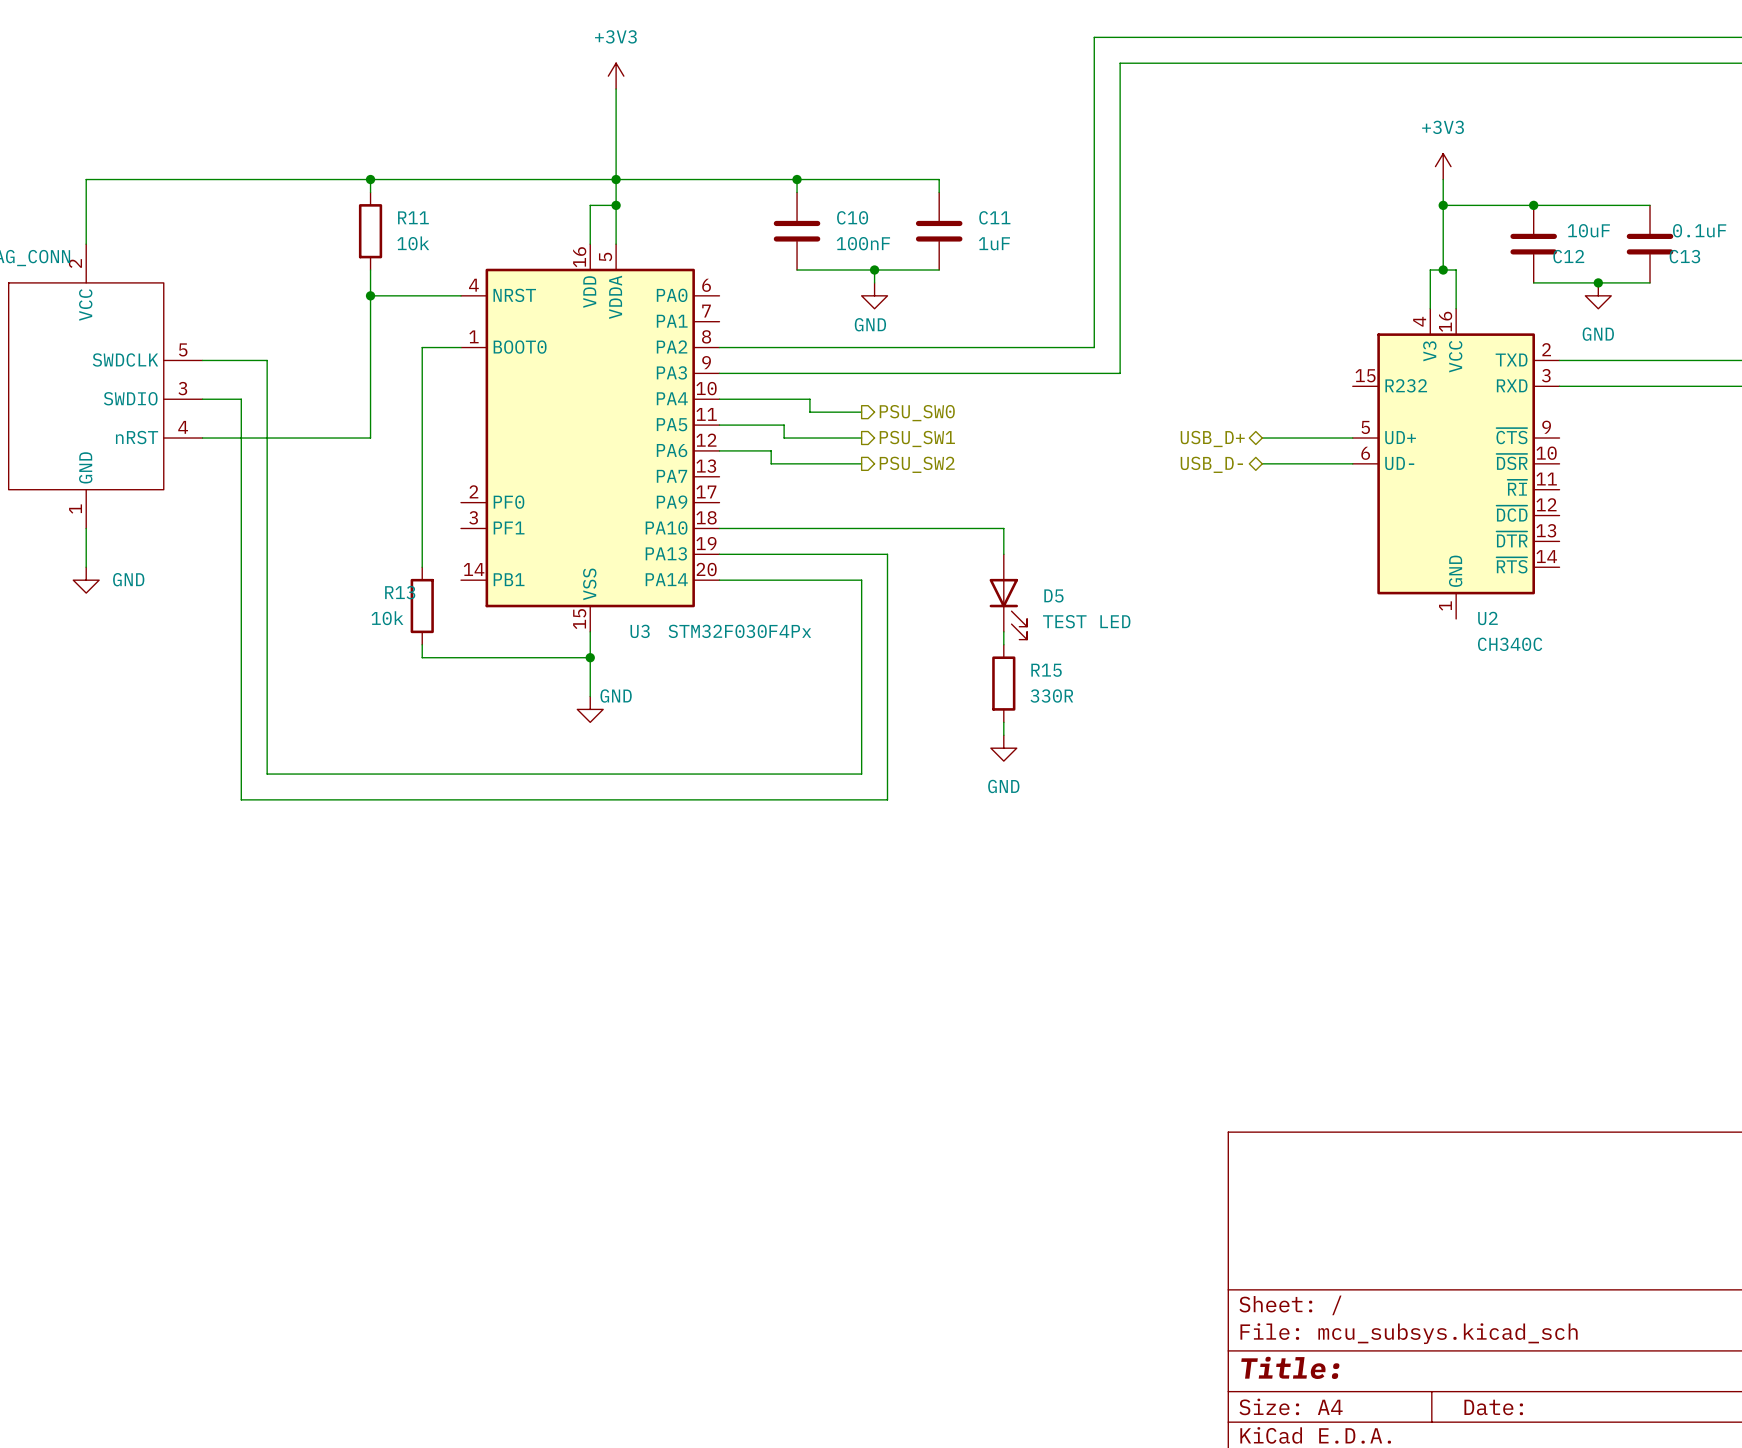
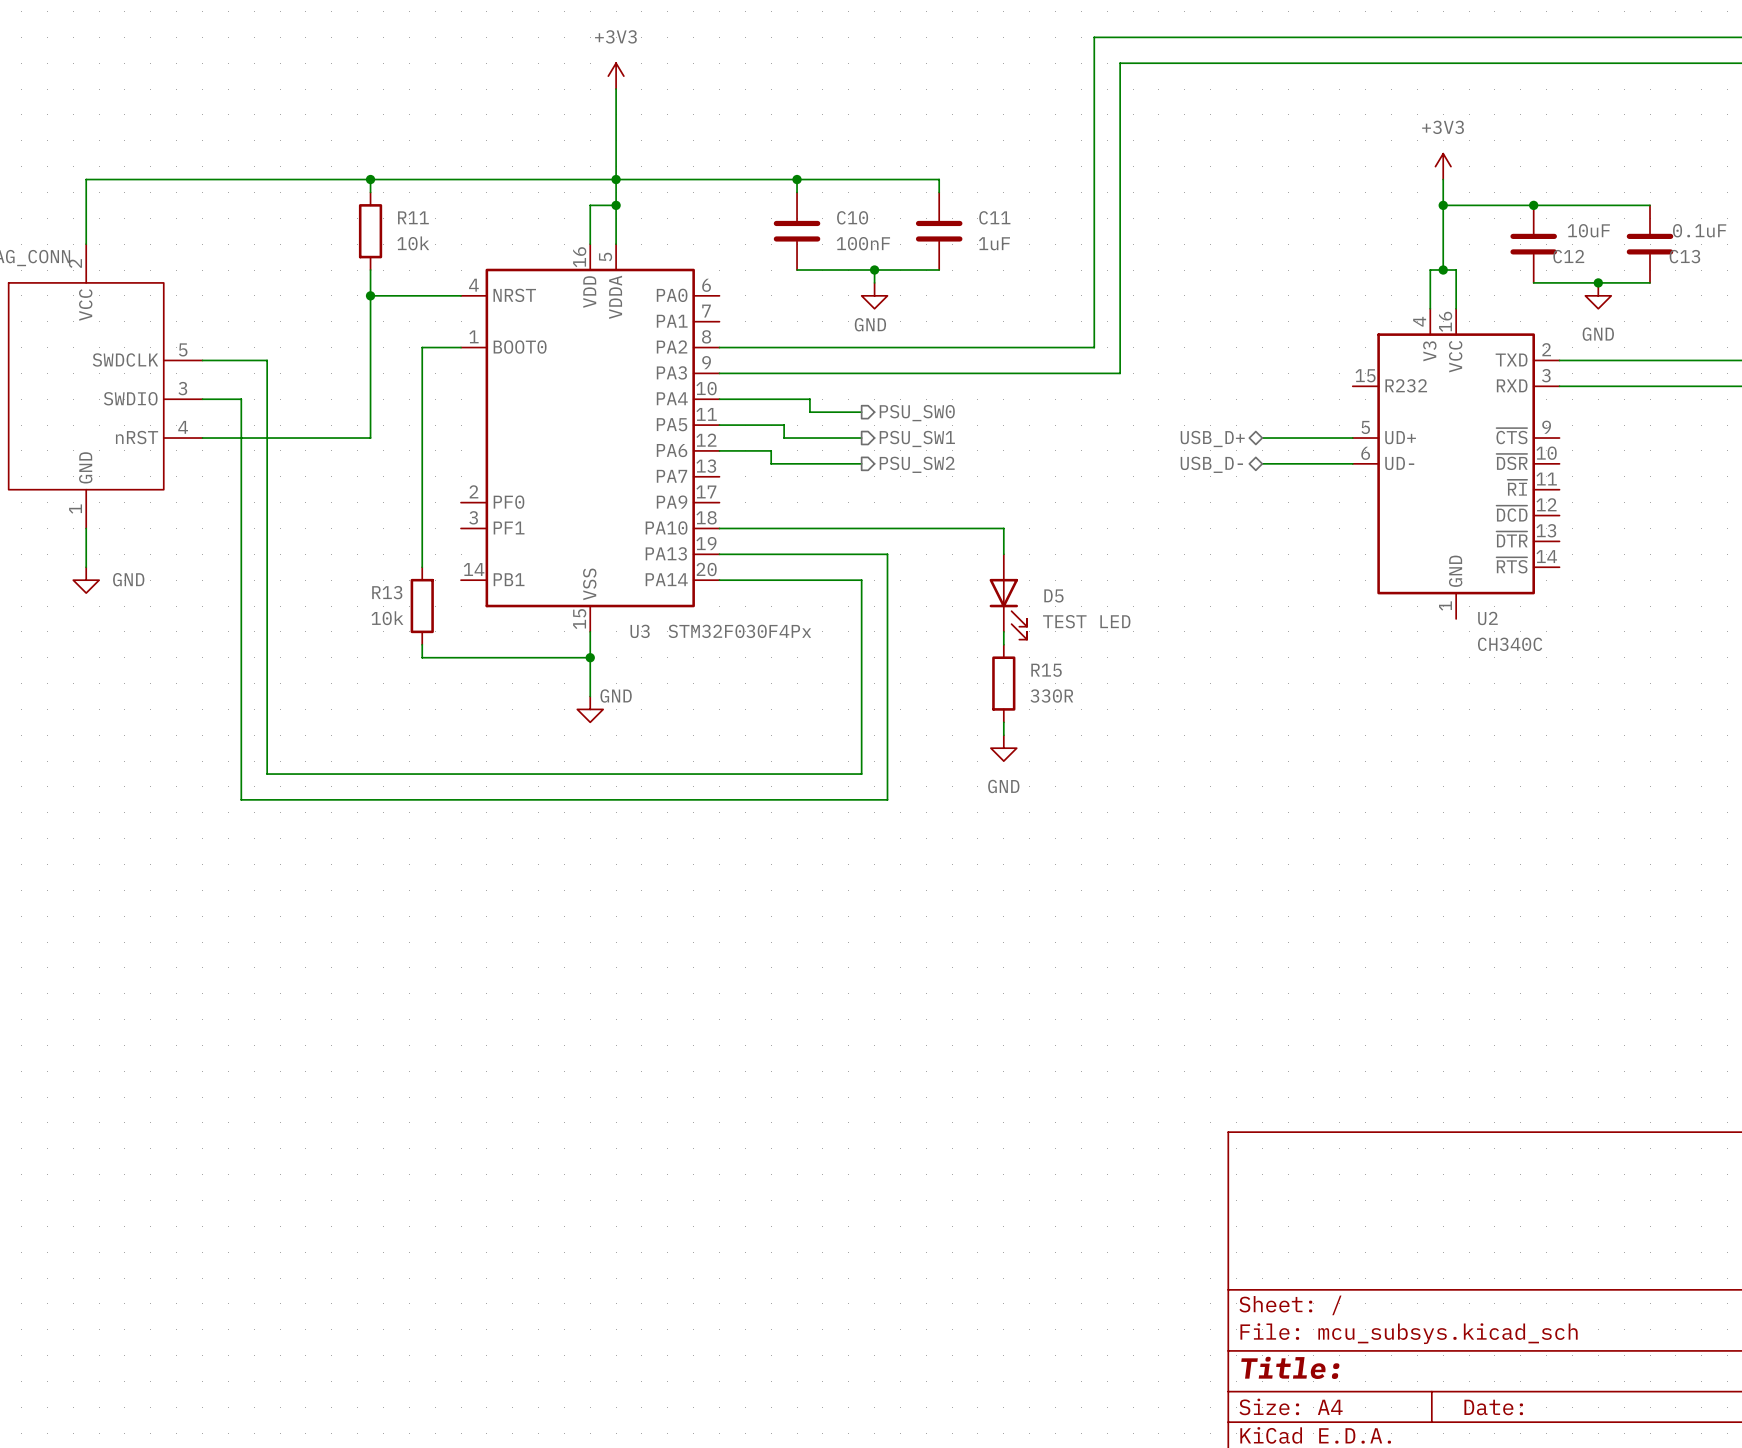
R13 name position: R13 (400, 592) -> R13 (387, 592)

